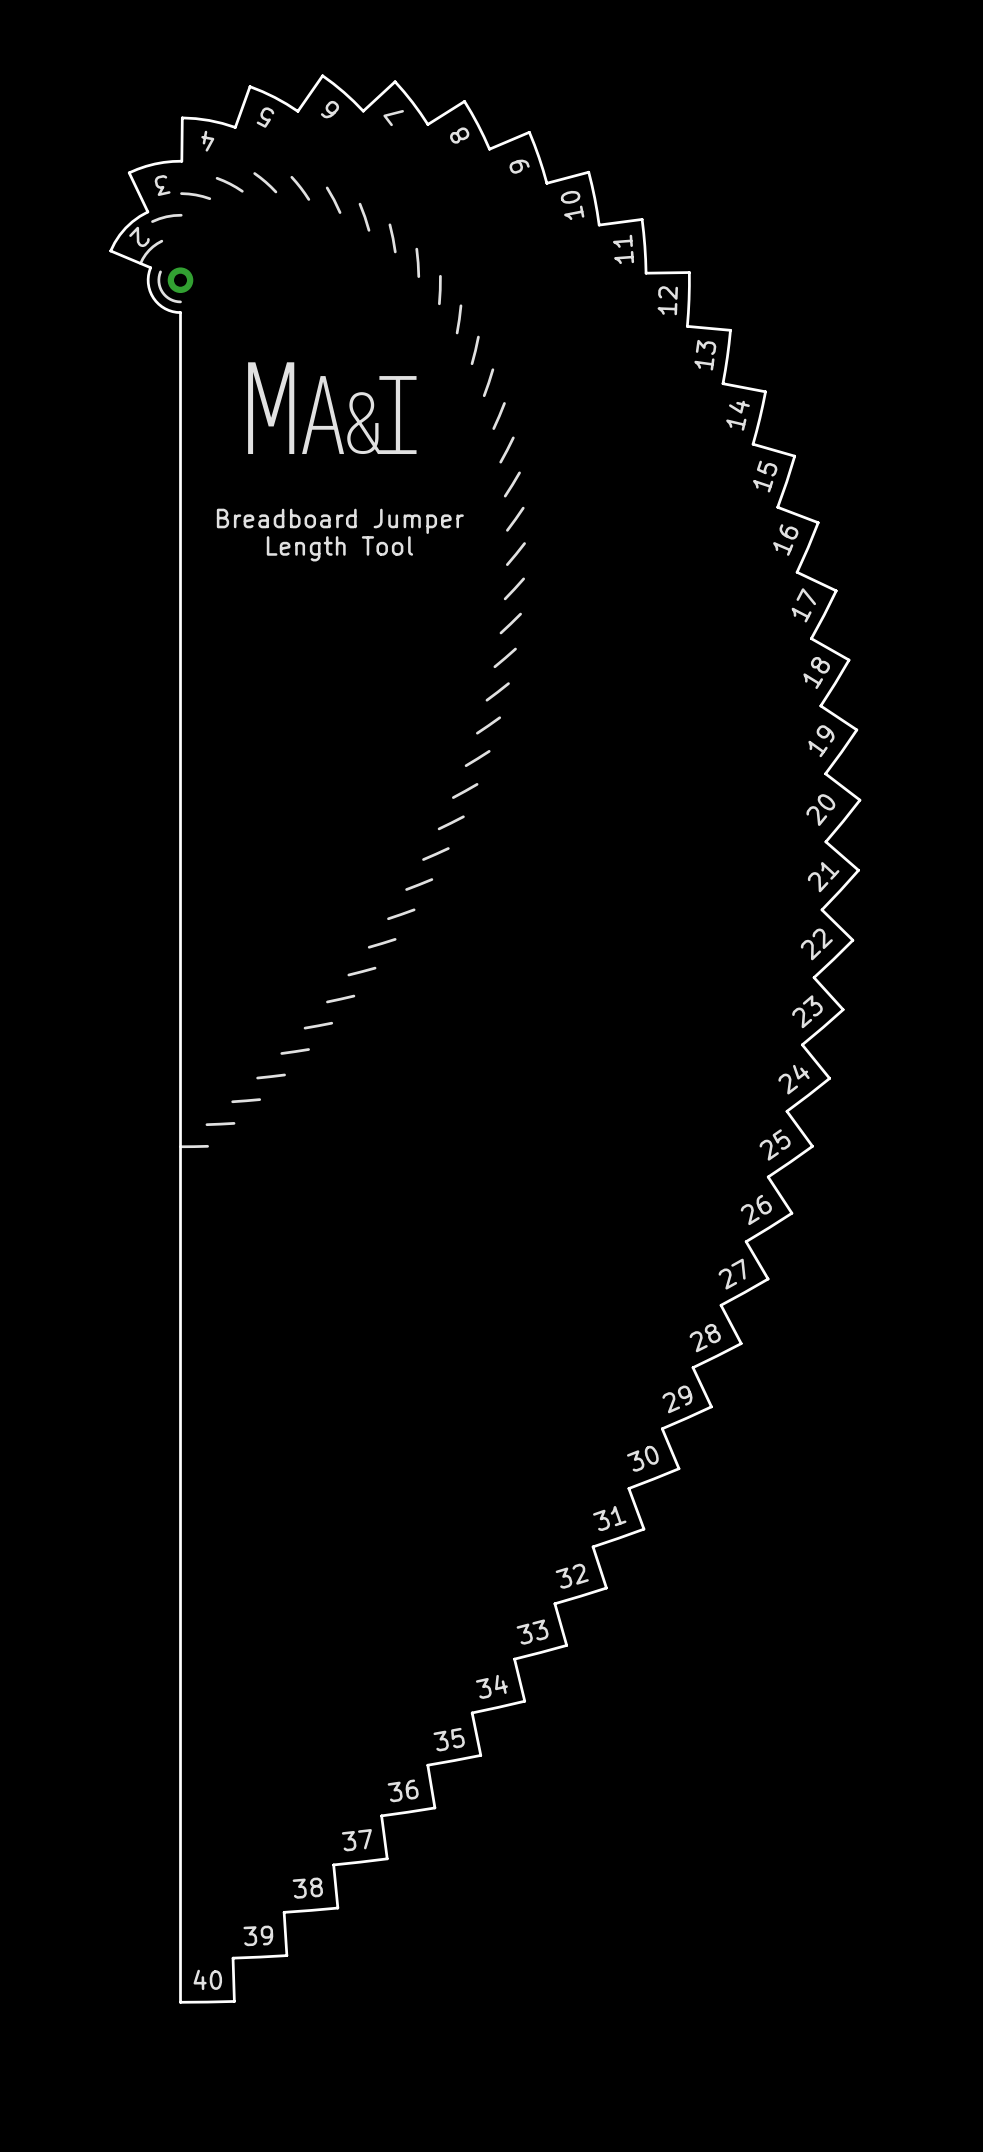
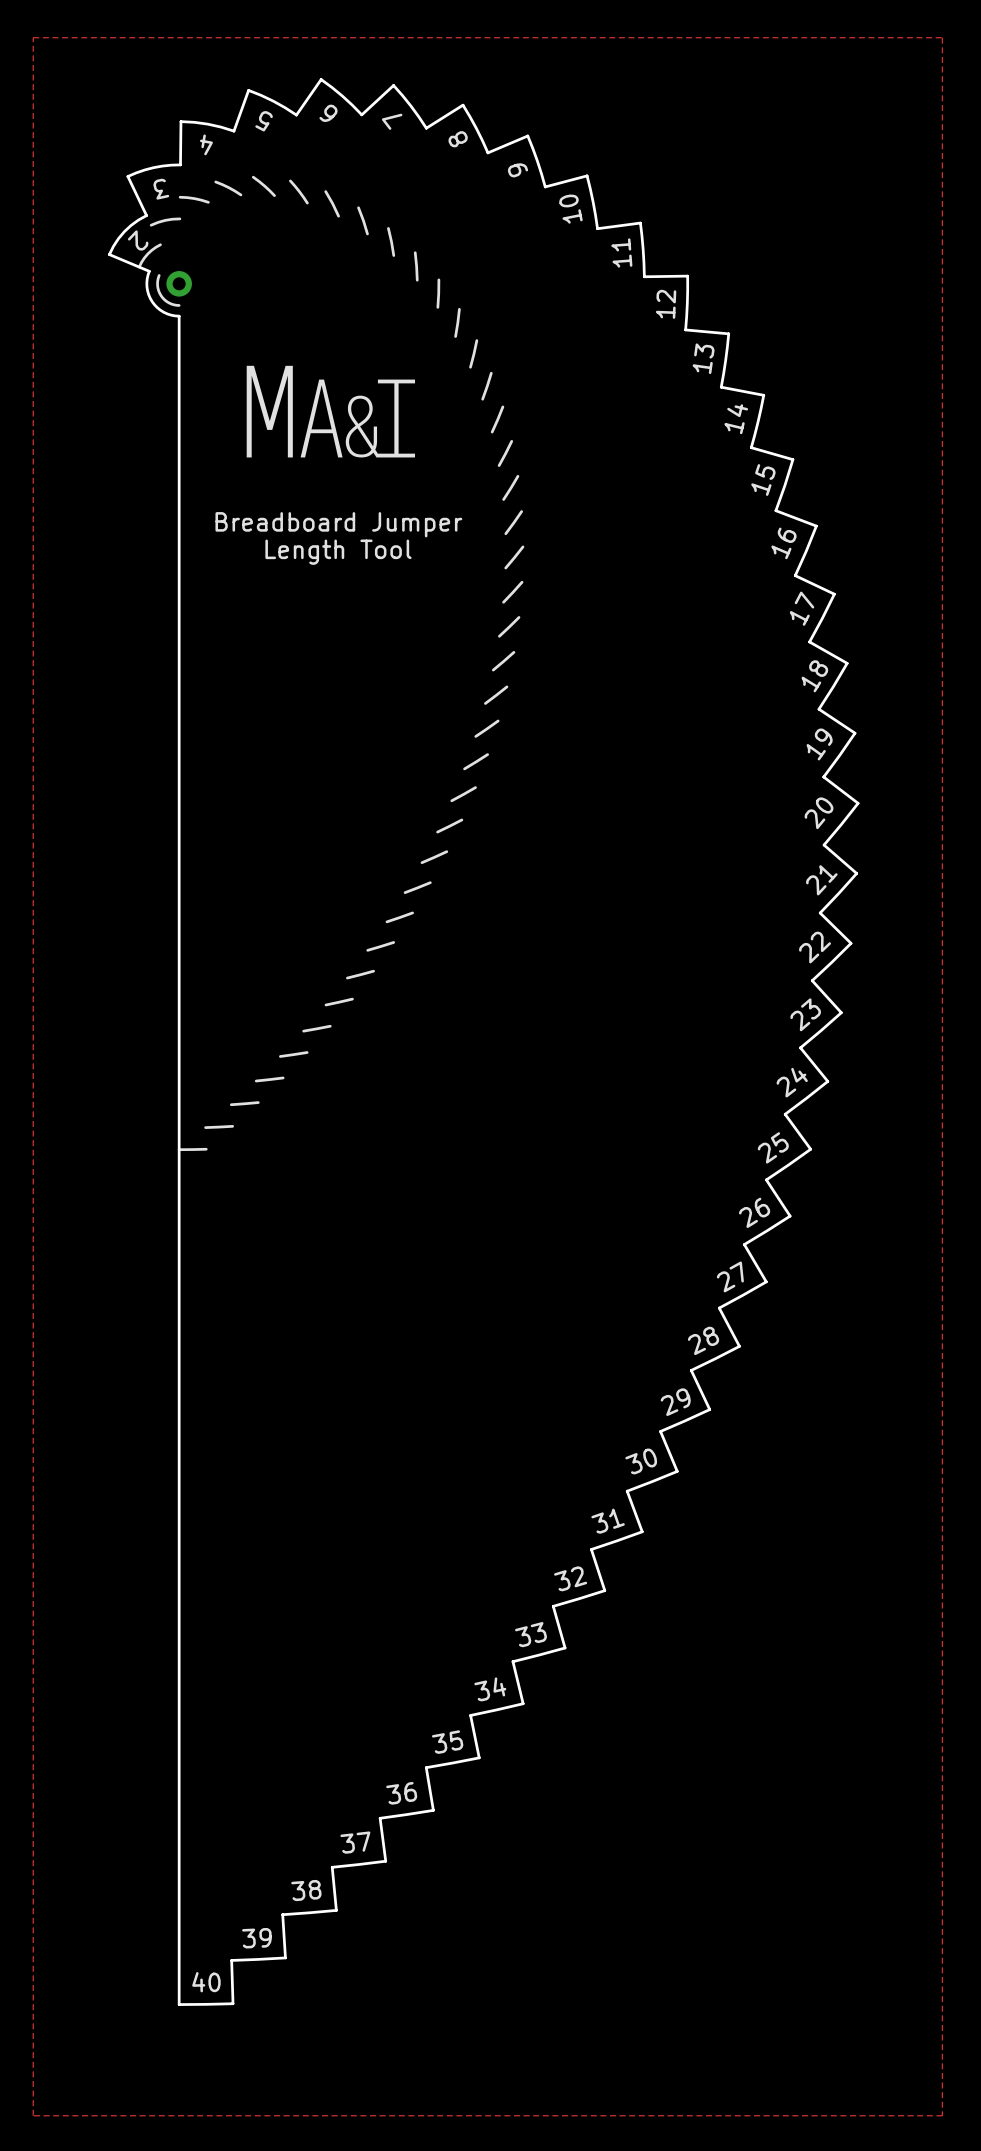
zone outline: none -> (33, 37) (942, 37) (942, 2115) (33, 2115) (33, 37)

